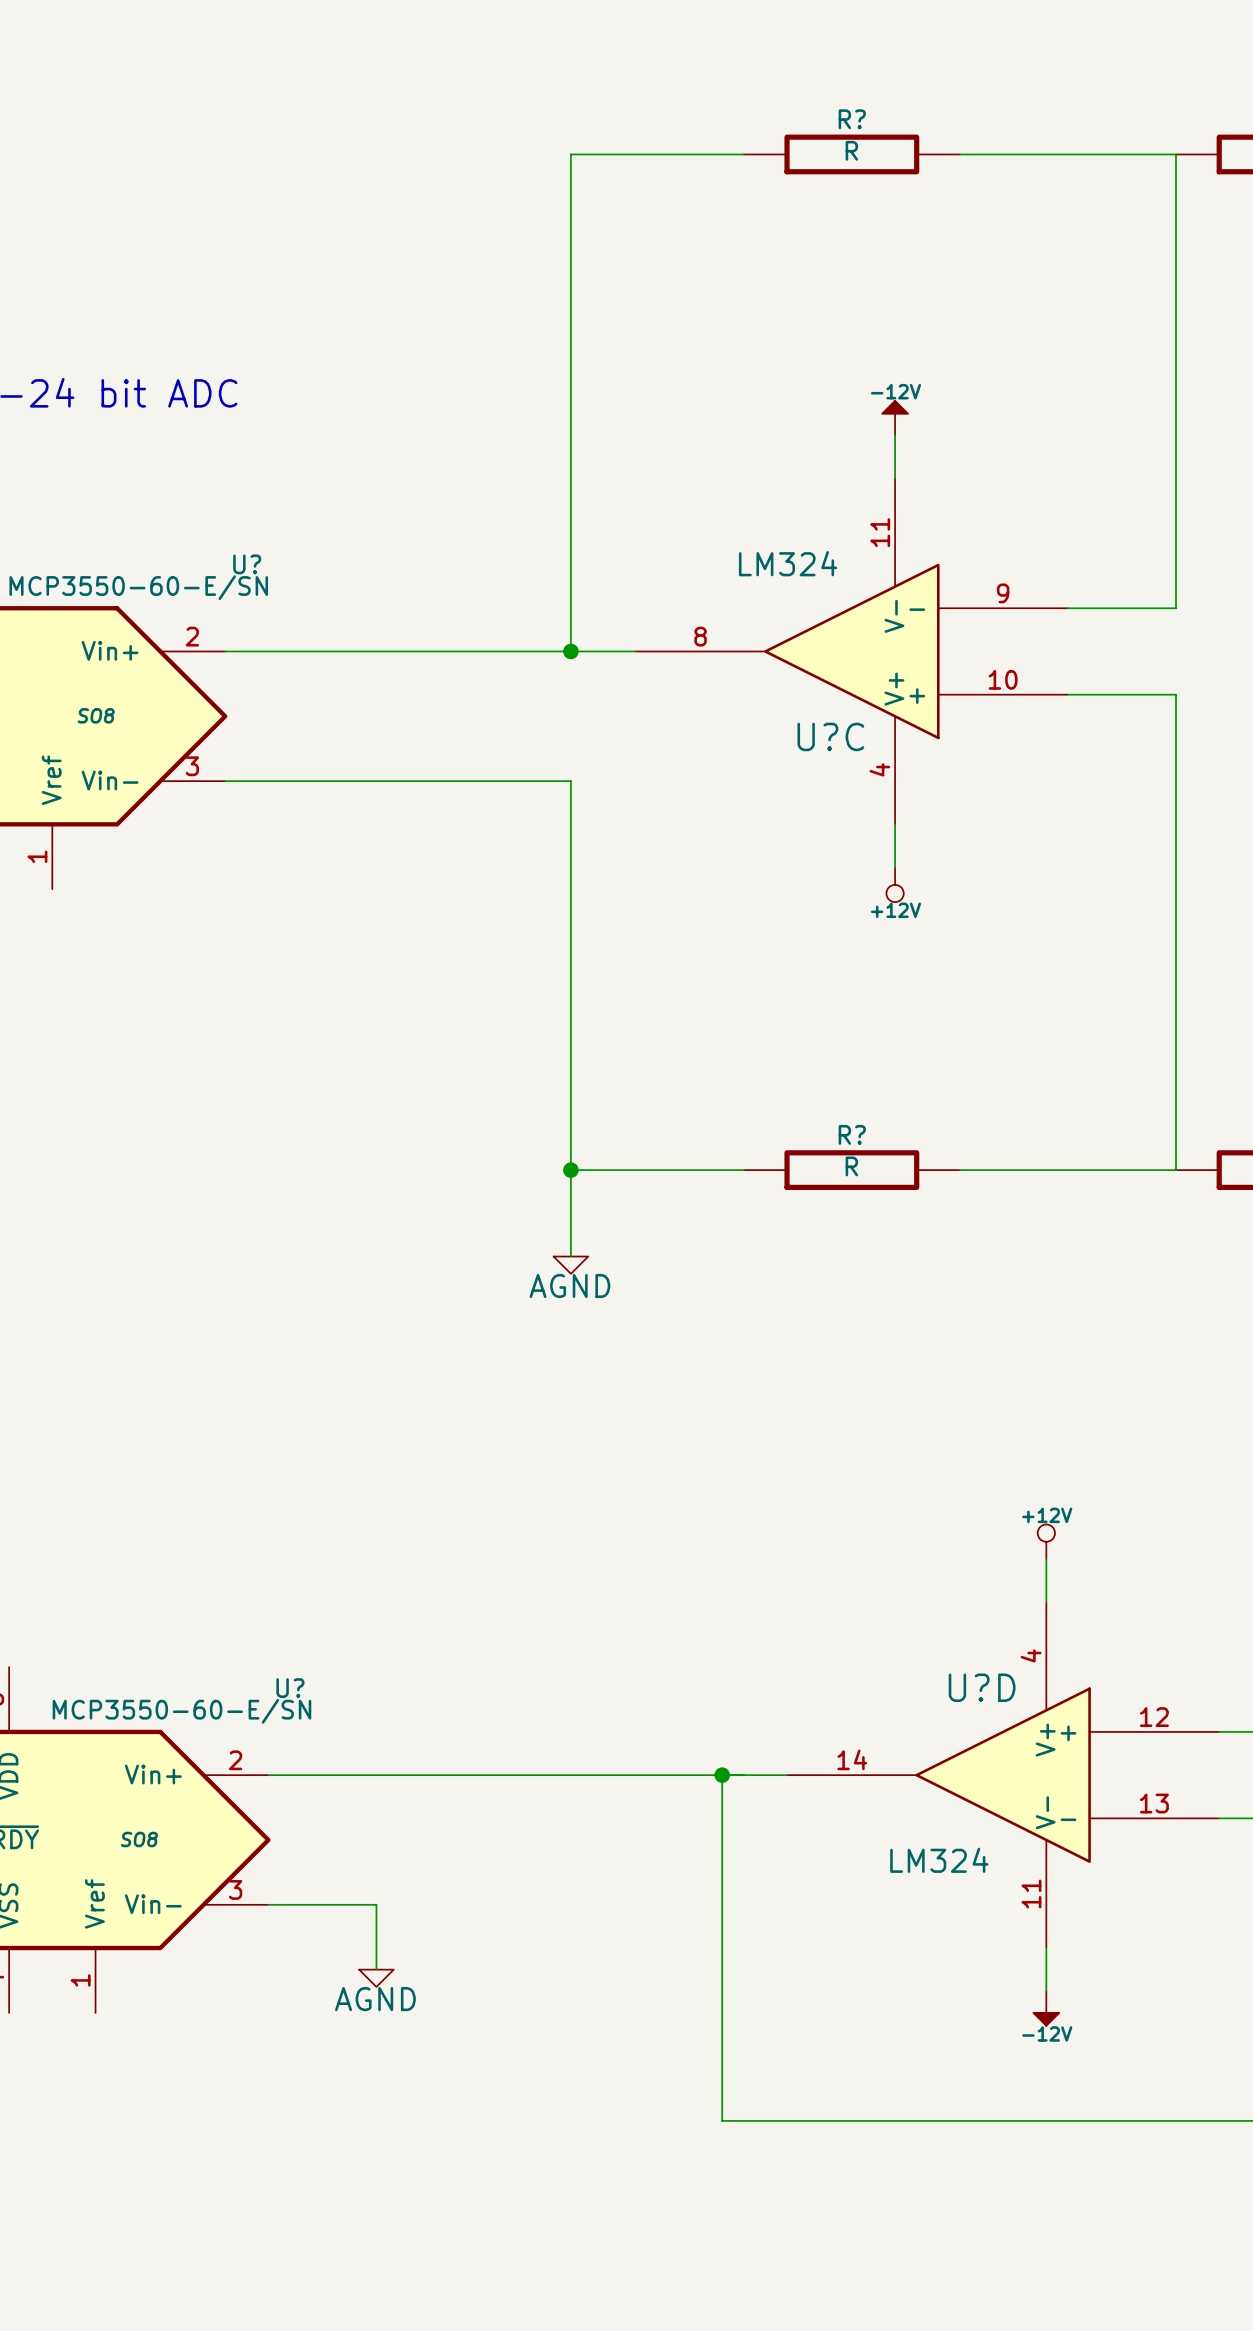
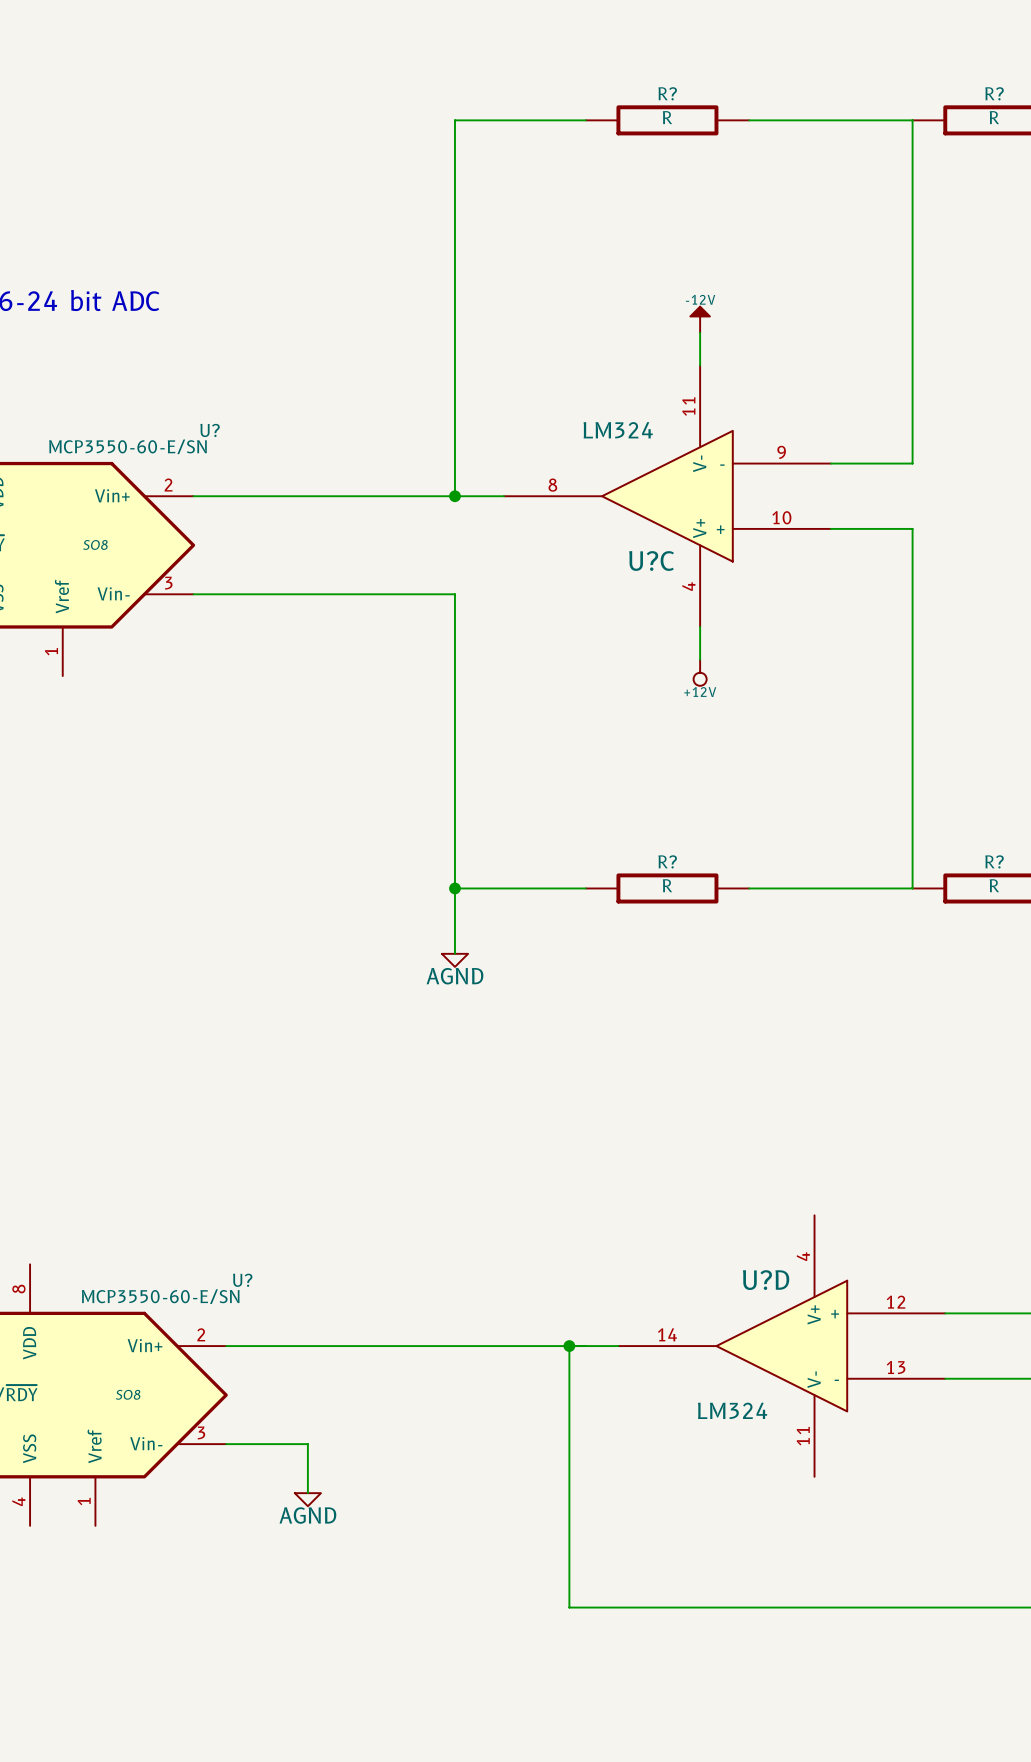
power symbol: +12V (1046, 1541) -> none
wire: (1046, 1559) (1046, 1602) -> none
wire: (1046, 1948) (1046, 1991) -> none
power symbol: -12V (1046, 2008) -> none

